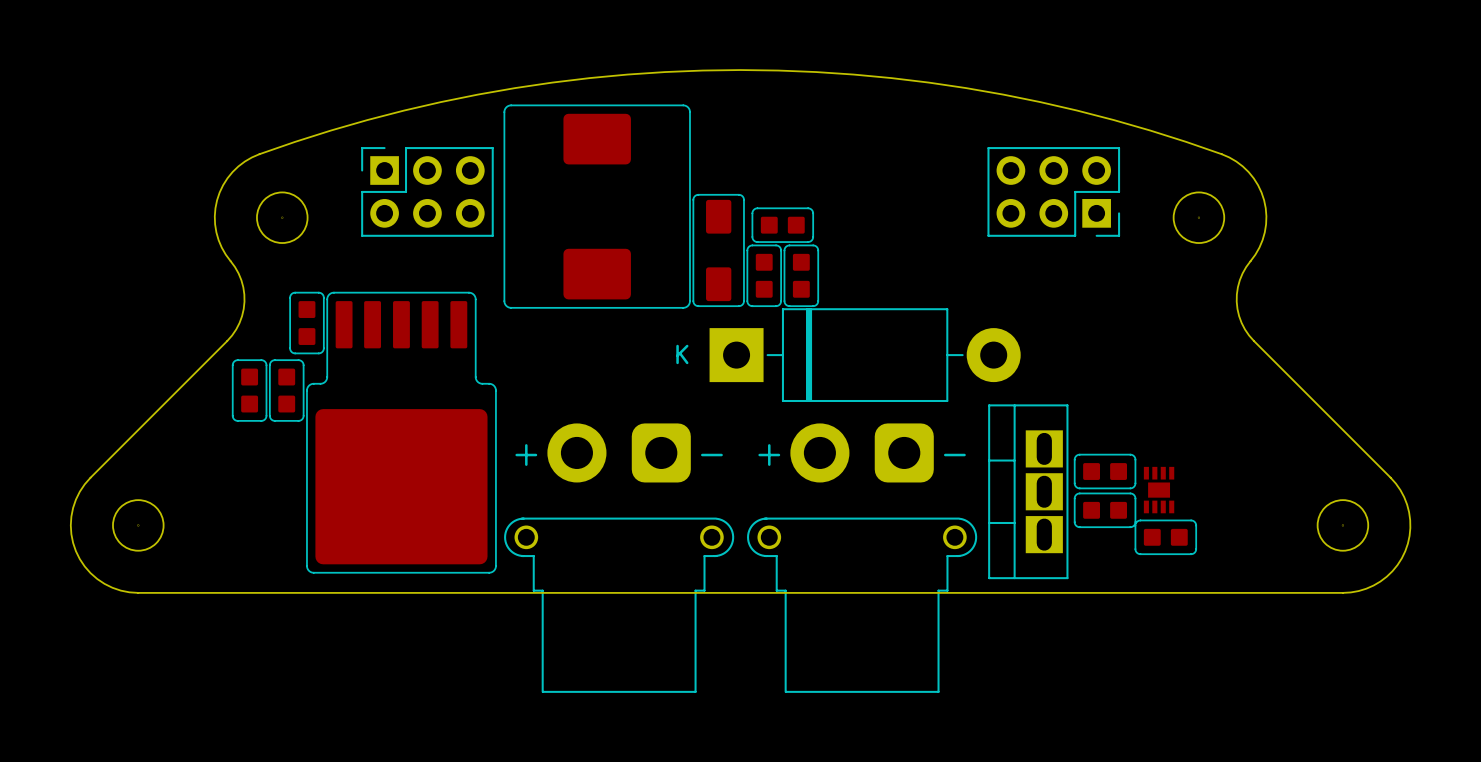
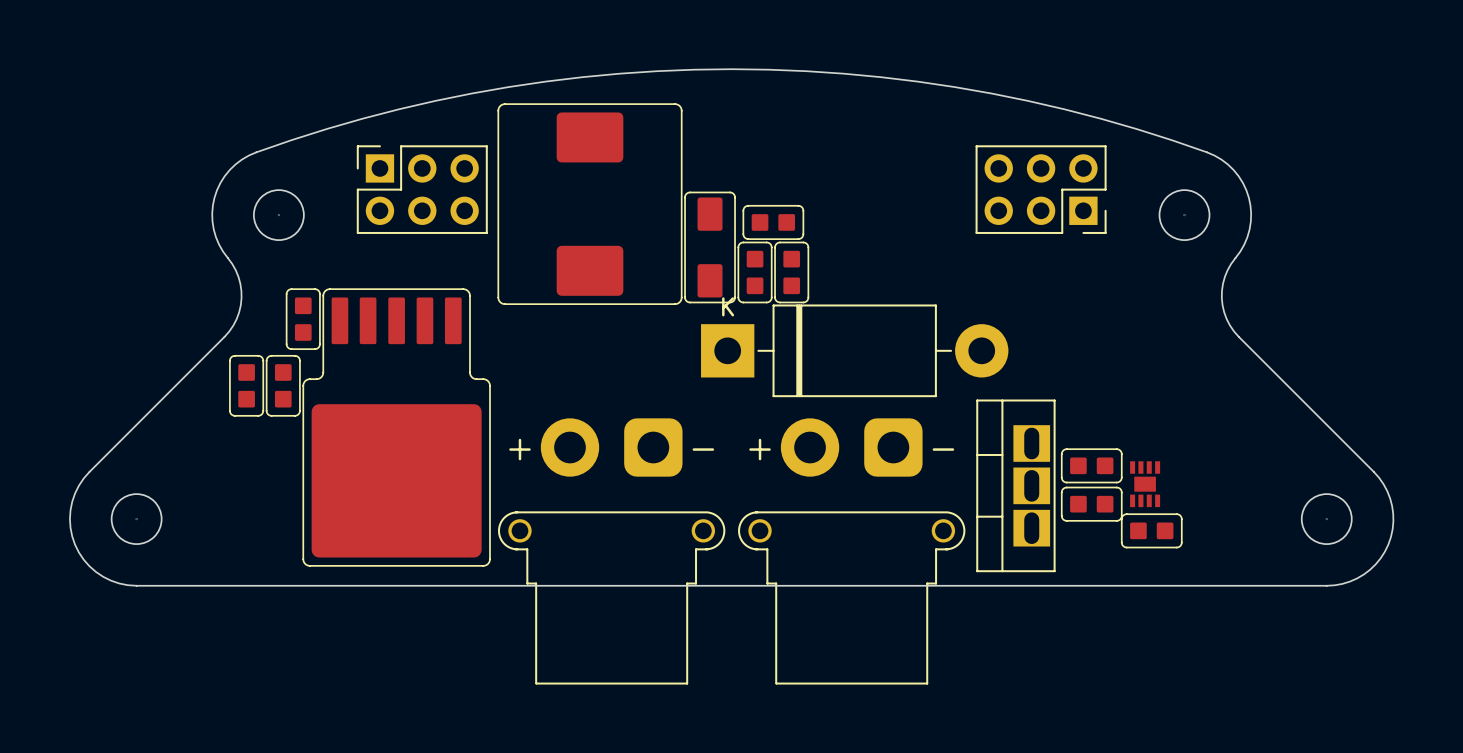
part text position: K (682, 354) -> K (728, 306)

